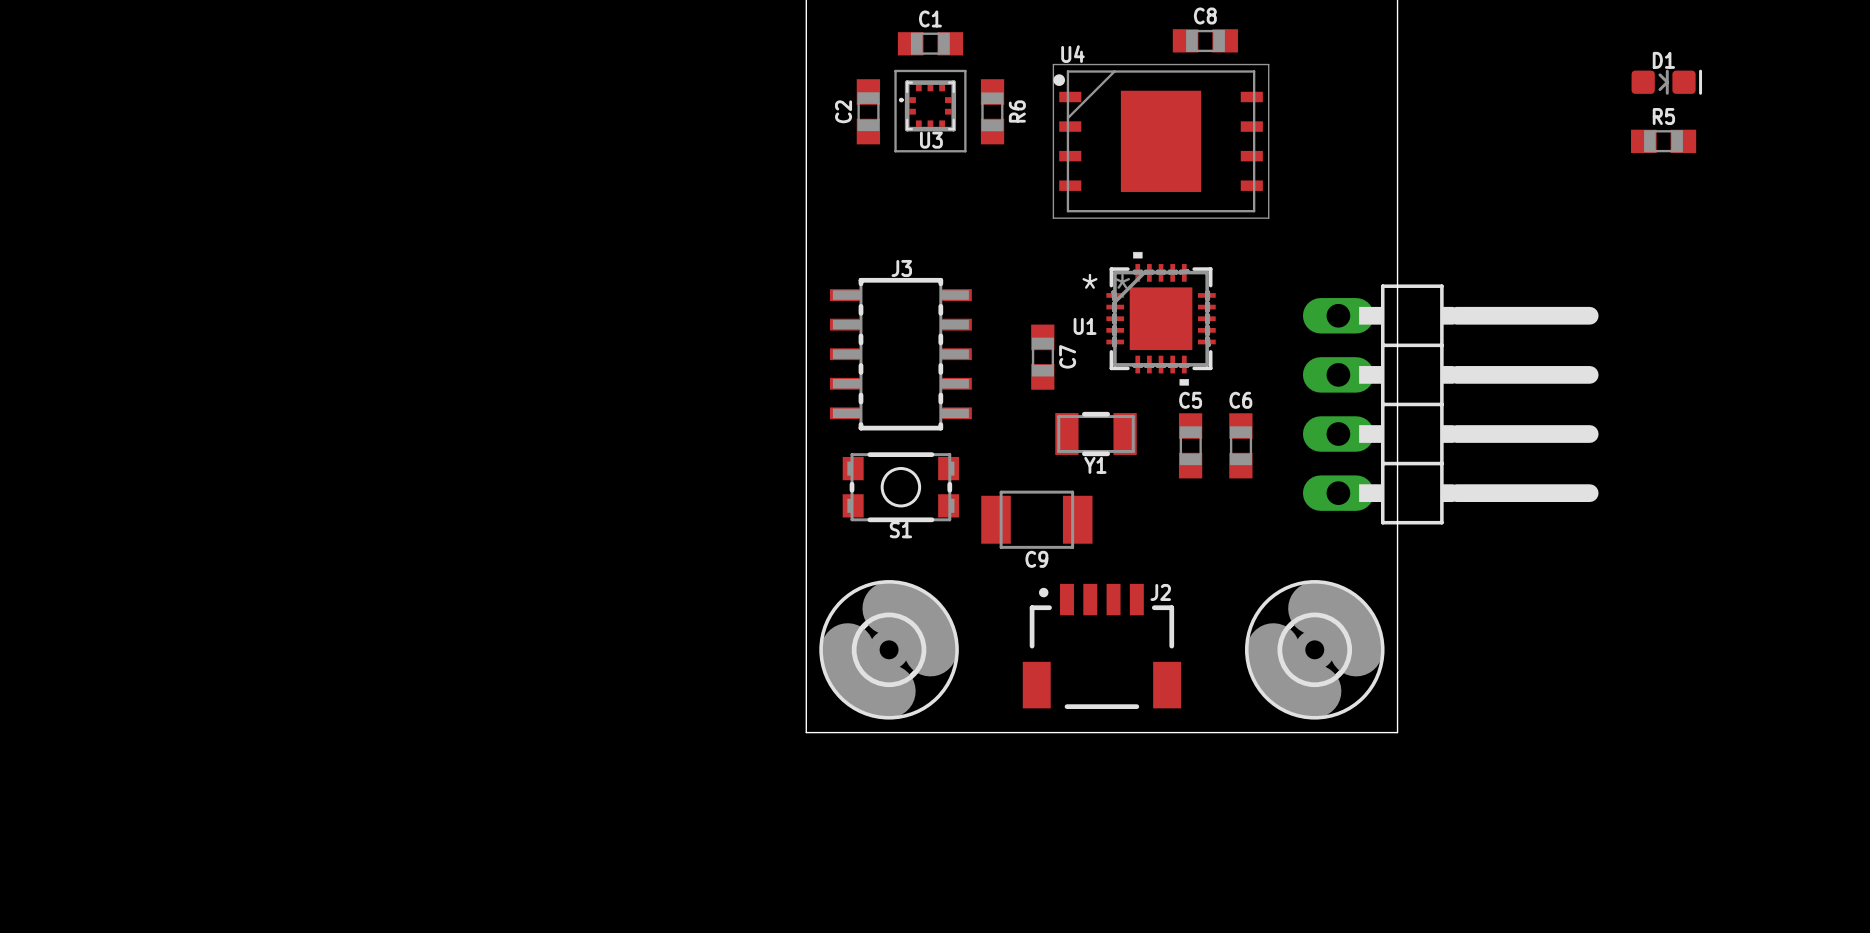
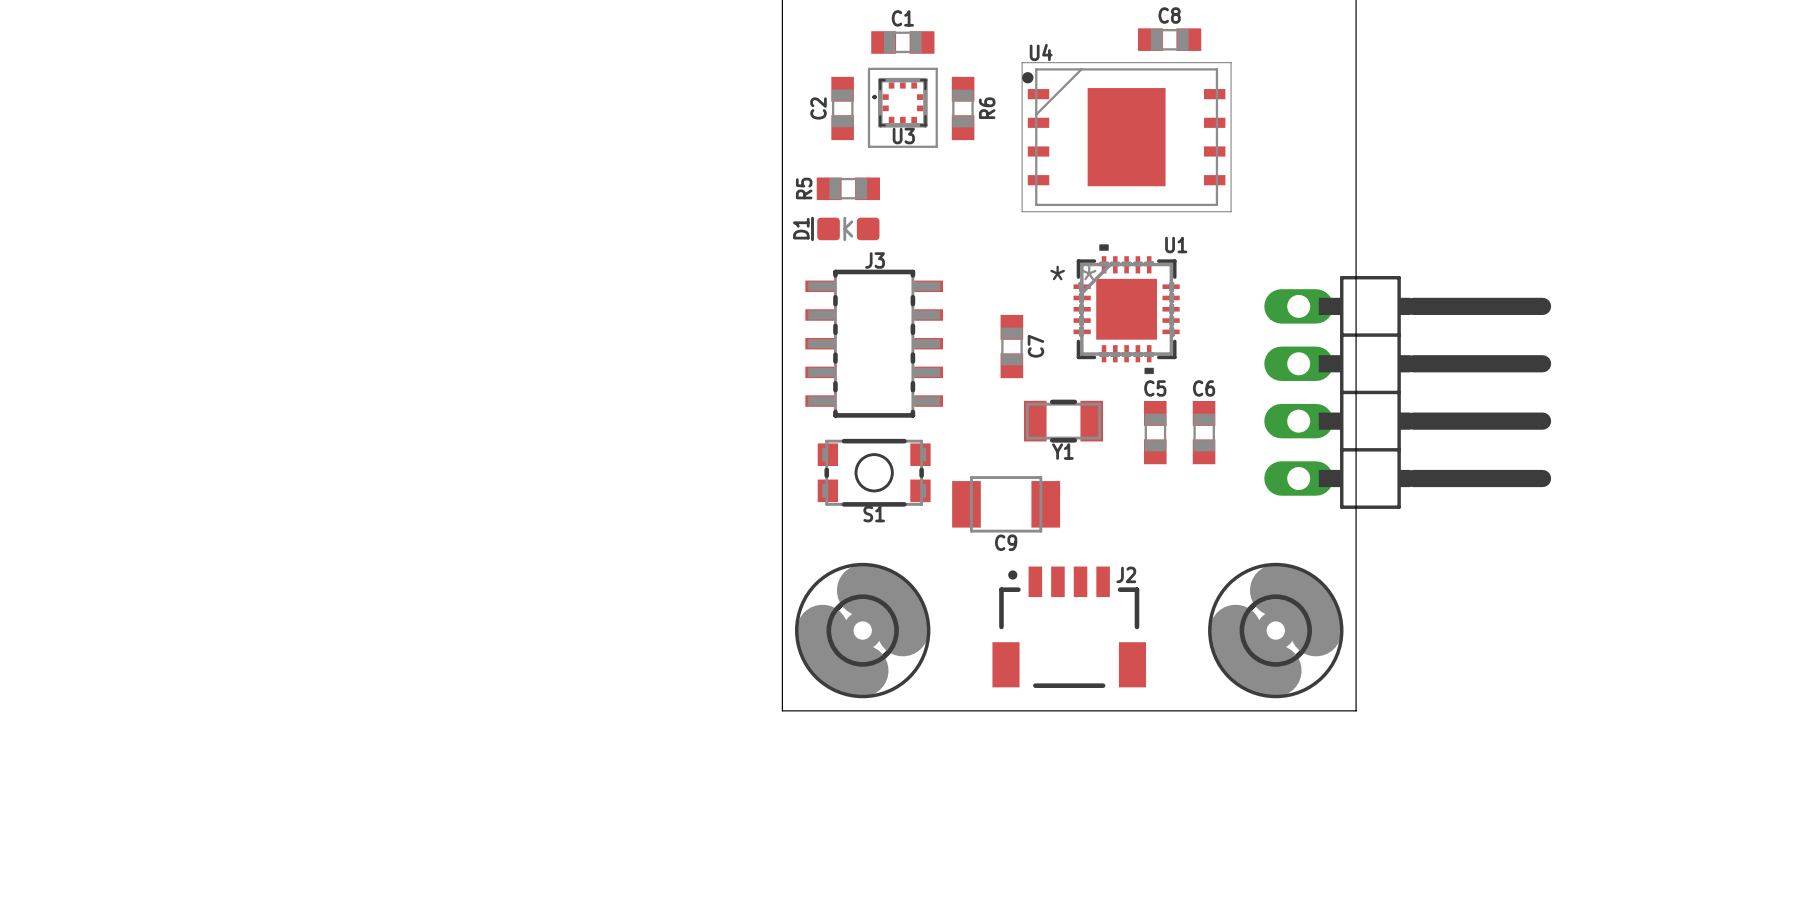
D1 rotation: 0° (1666, 82) -> 180° (845, 228)
D1 position: (1666, 82) -> (845, 228)
R5 name rotation: 0° (1663, 116) -> 90° counterclockwise (804, 188)
R5 name position: R5 (1663, 116) -> R5 (804, 188)
R5 position: (1663, 141) -> (848, 188)
U1 name position: U1 (1085, 326) -> U1 (1176, 245)

